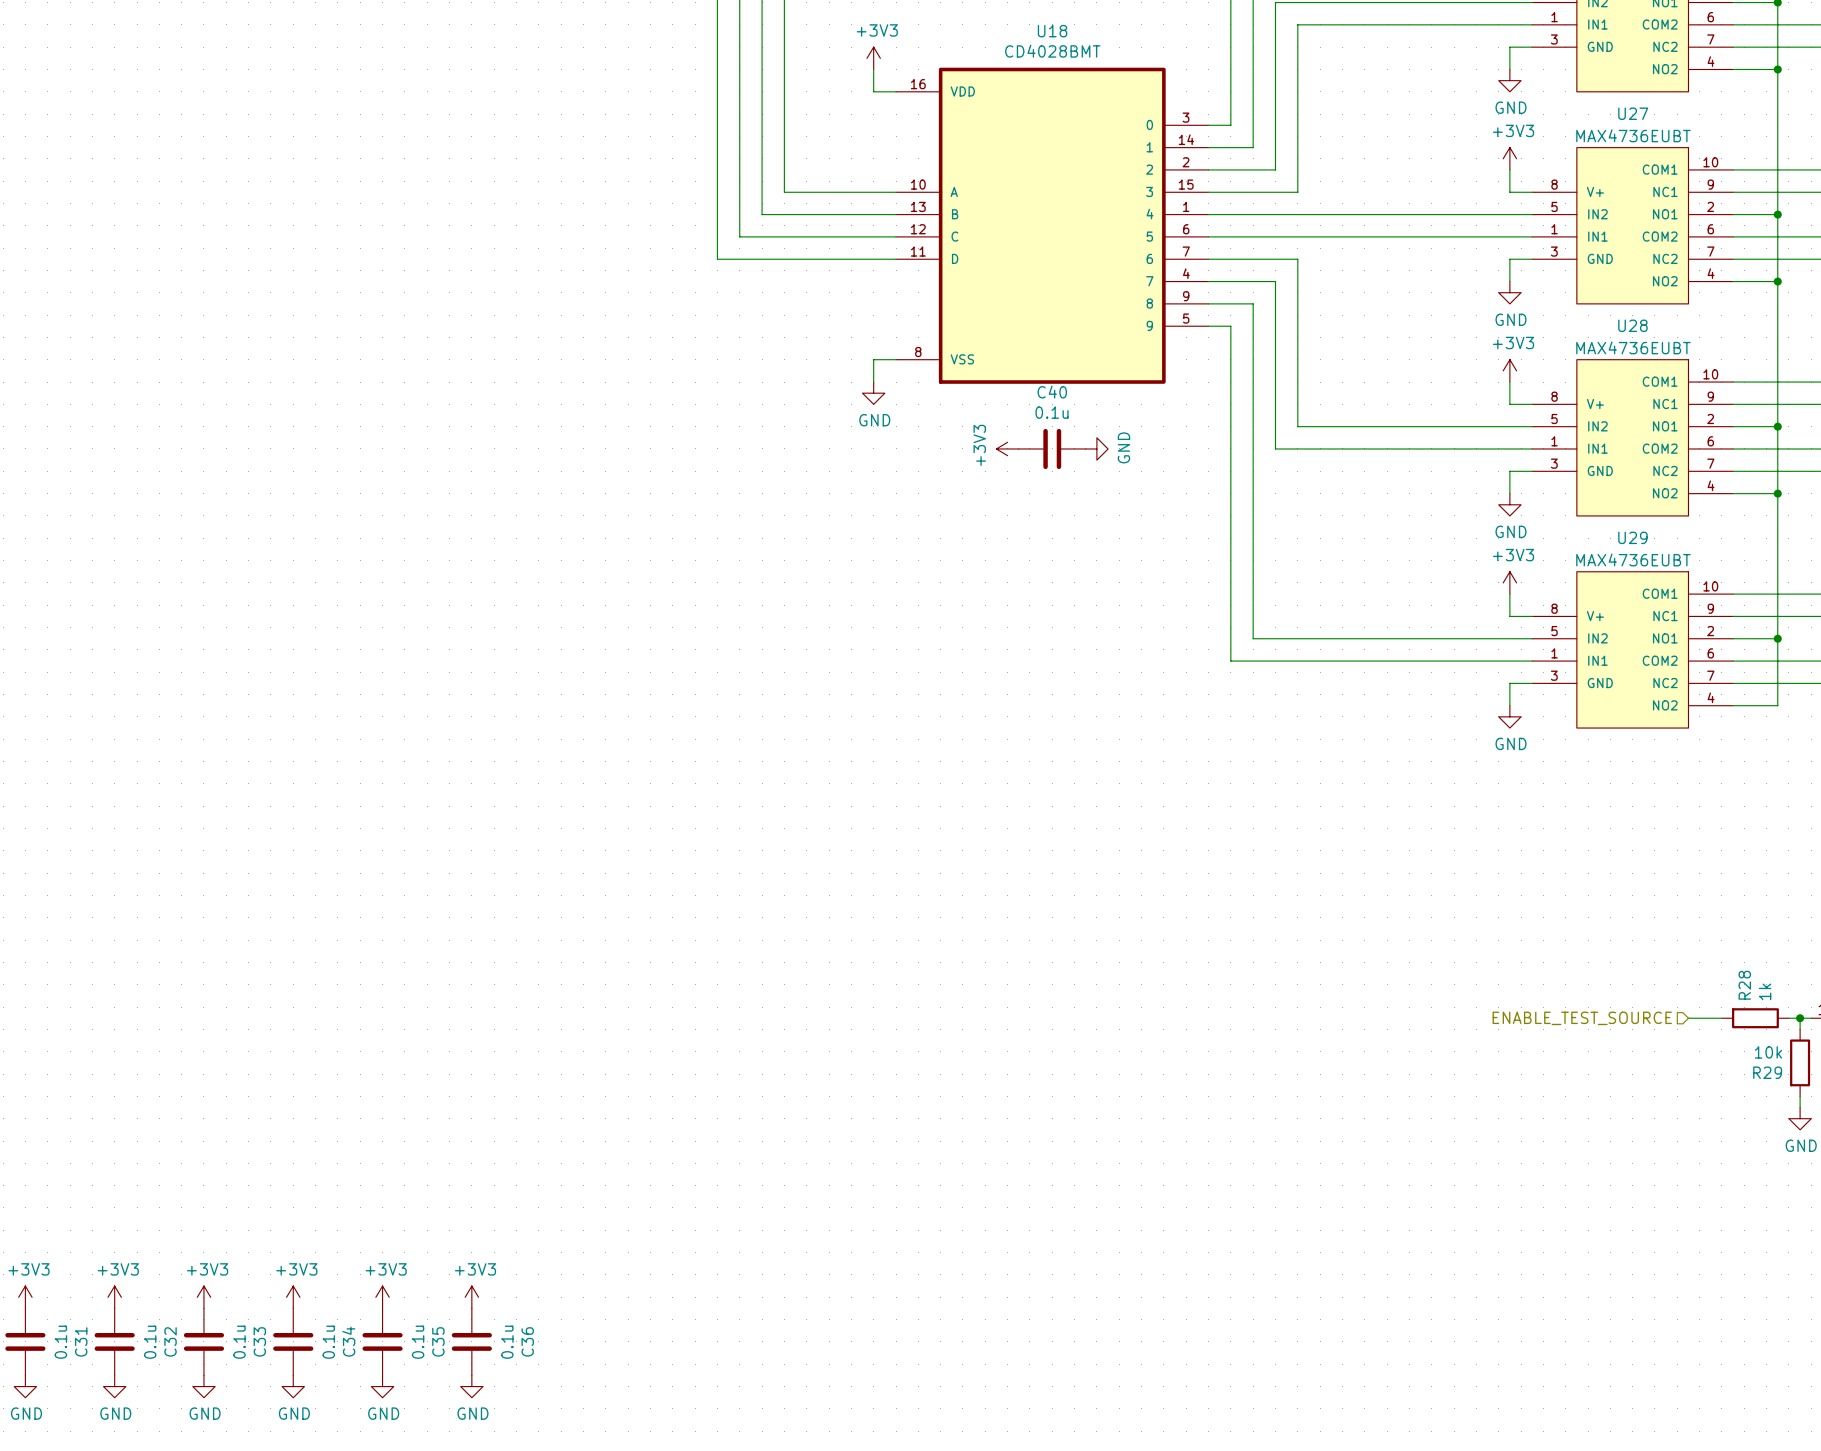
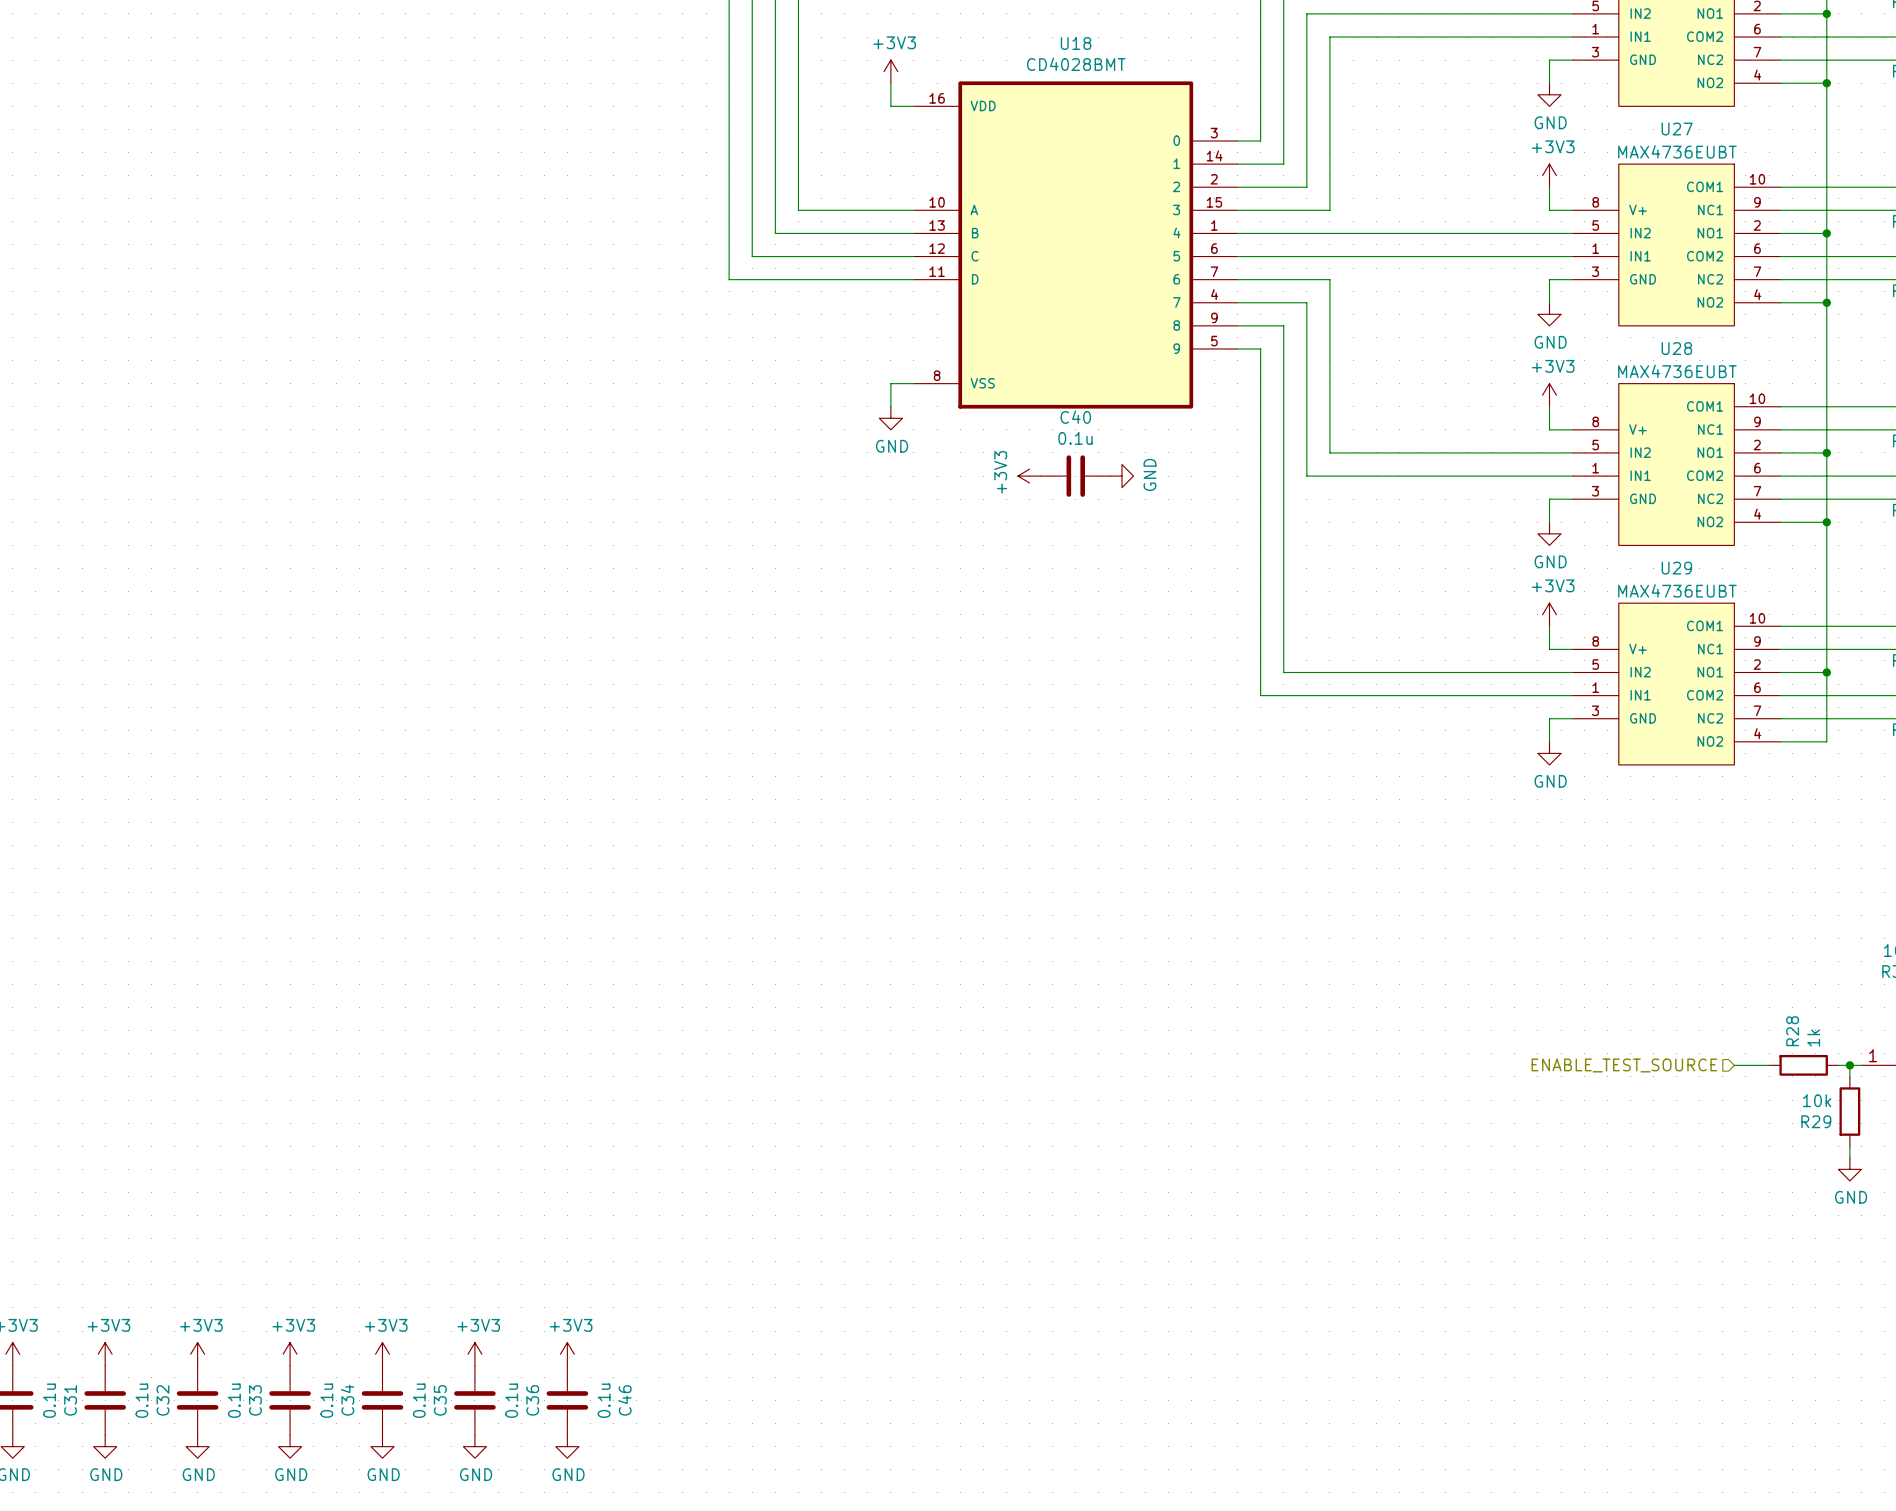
power symbol: none -> +3V3 (567, 1354)
C46: none -> 0.1u (567, 1400)
power symbol: none -> GND (567, 1446)

